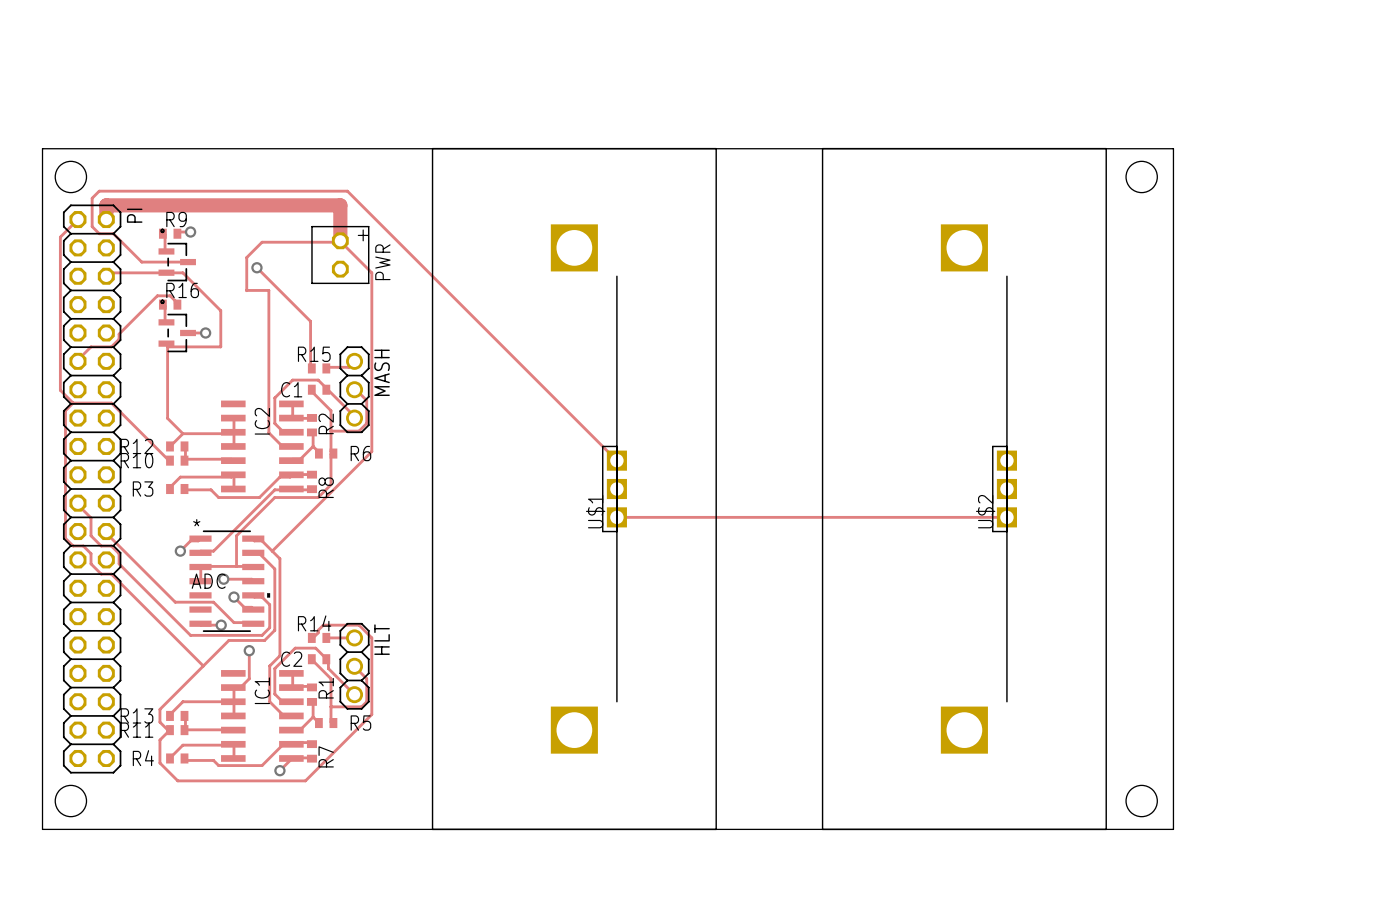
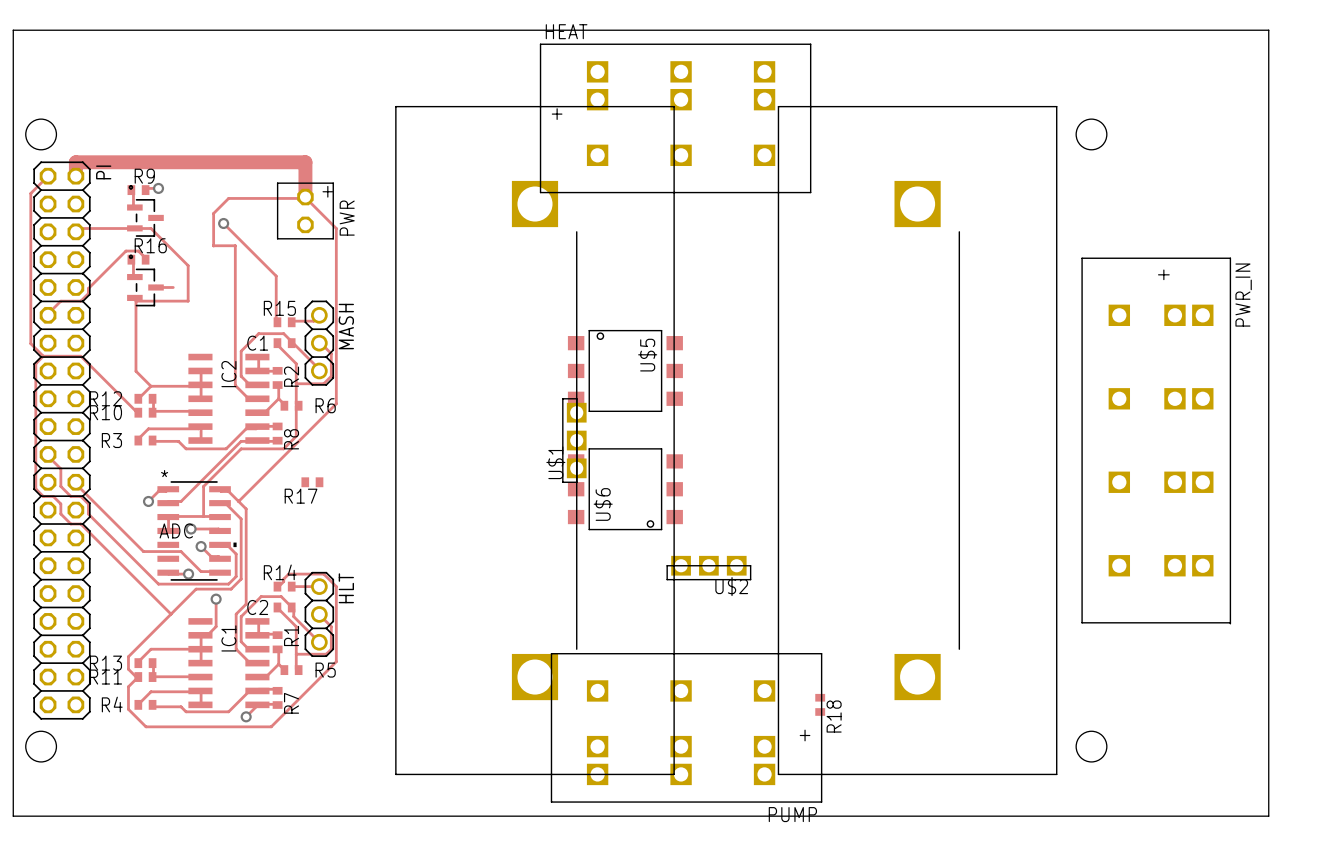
board edge: (42, 148) (1173, 148) (1173, 829) (42, 829) -> (13, 106) (13, 30) (1268, 30) (1268, 816) (13, 816) (13, 774)
HEAT: none -> (675, 118)
track: (188, 262) (141, 262) (113, 233) (99, 233) (92, 226) (92, 198) (99, 191) (347, 191) (616, 460) -> none
via: (205, 332) -> none
U$5: none -> (625, 370)
U$2 rotation: 0° (1004, 489) -> 90° counterclockwise (708, 568)
U$2 position: (1004, 489) -> (708, 568)
PWR_IN: none -> (1156, 441)
track: (616, 517) (1006, 517) -> none
R17: none -> (312, 482)
U$6: none -> (625, 489)
R18: none -> (820, 704)
PUMP: none -> (686, 727)

